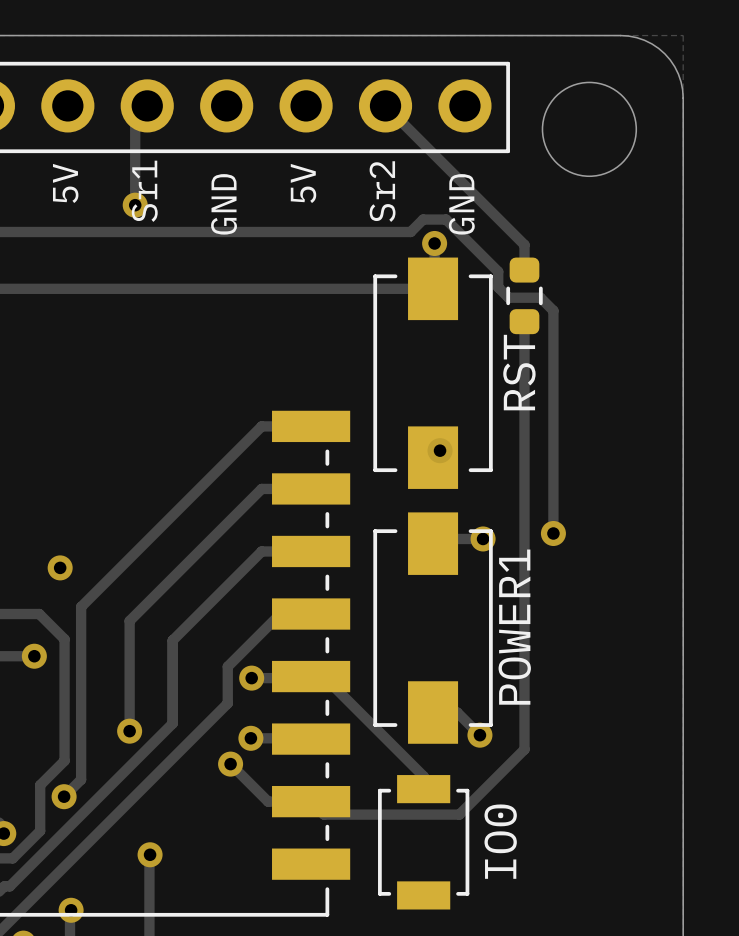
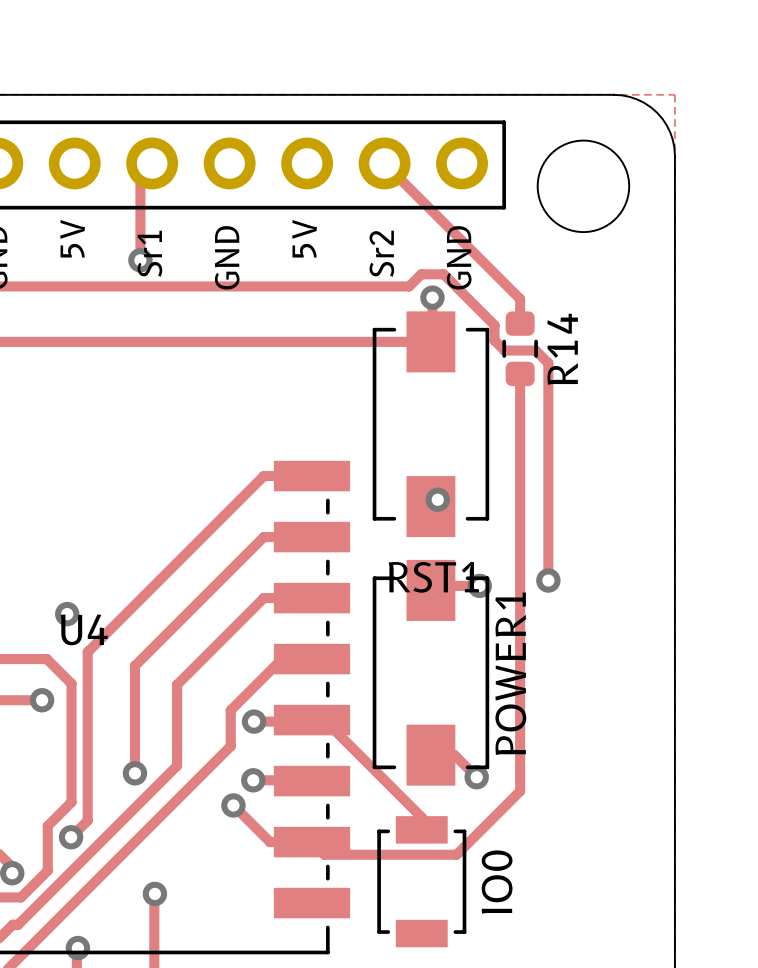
R14 name: none -> R14 (562, 349)
RST name: RST (519, 372) -> RST1 (433, 577)
U4 name: none -> U4 (84, 629)

